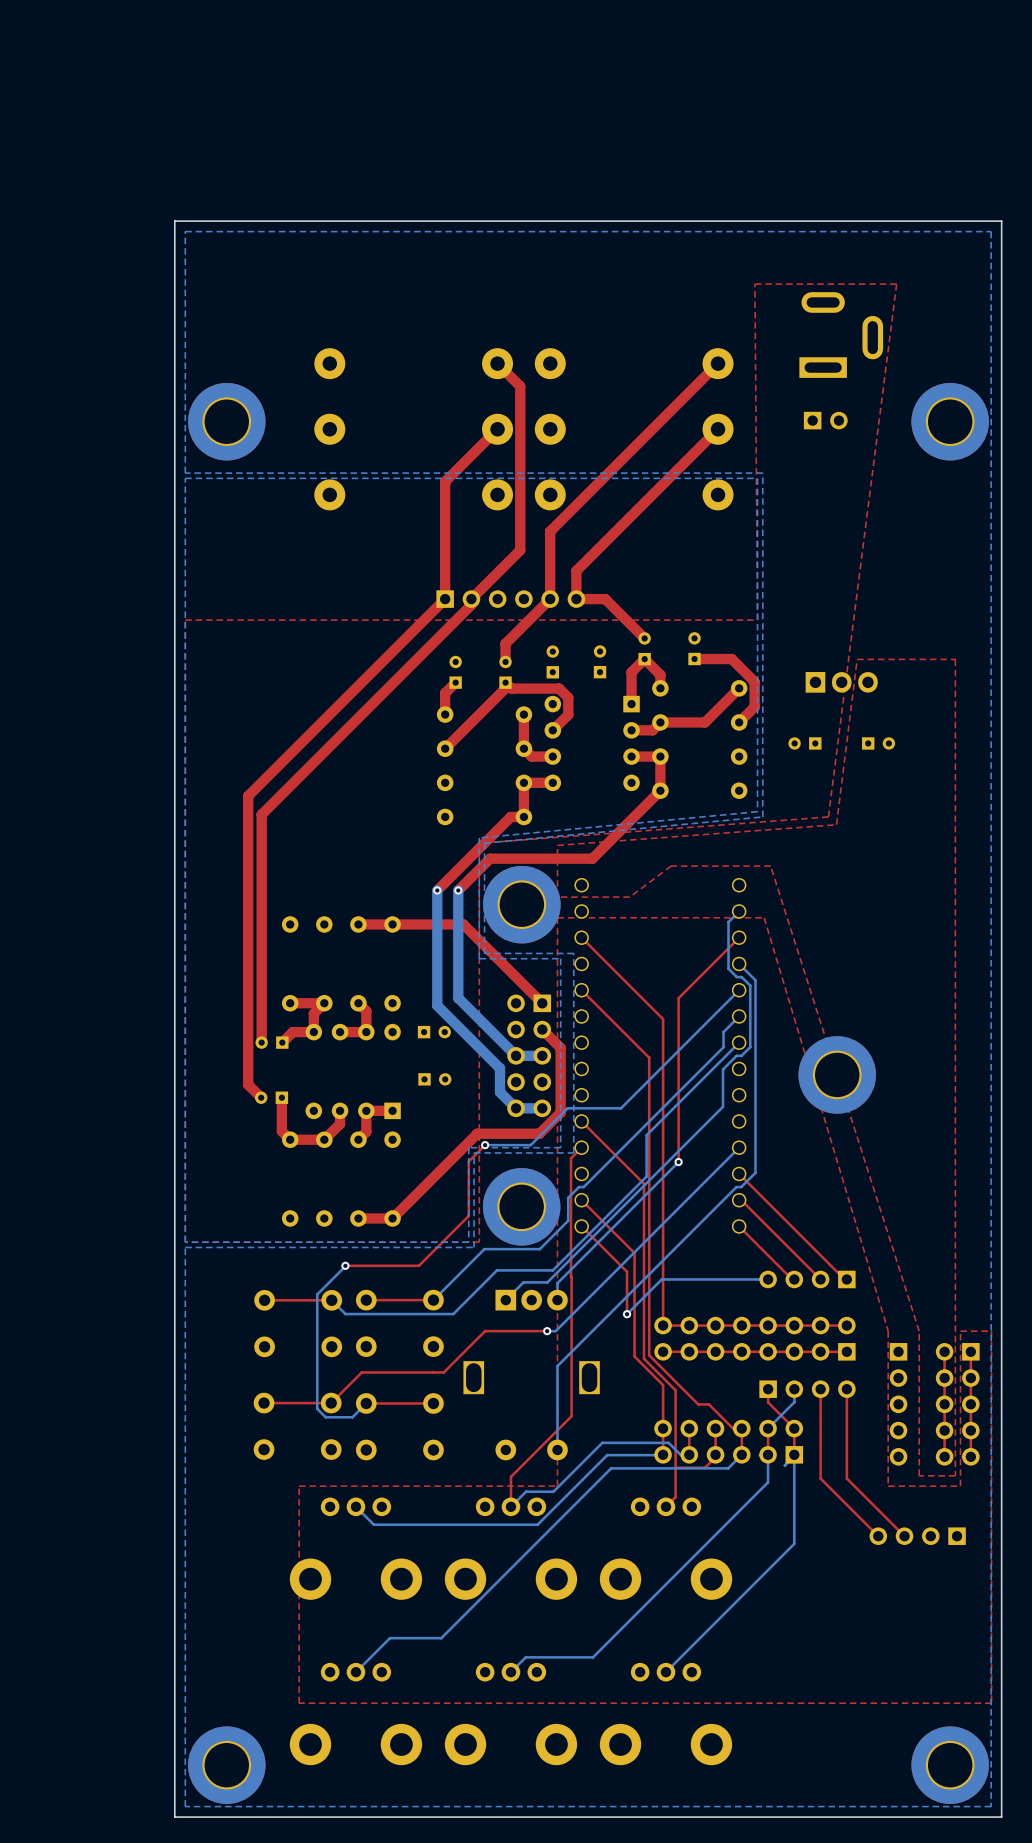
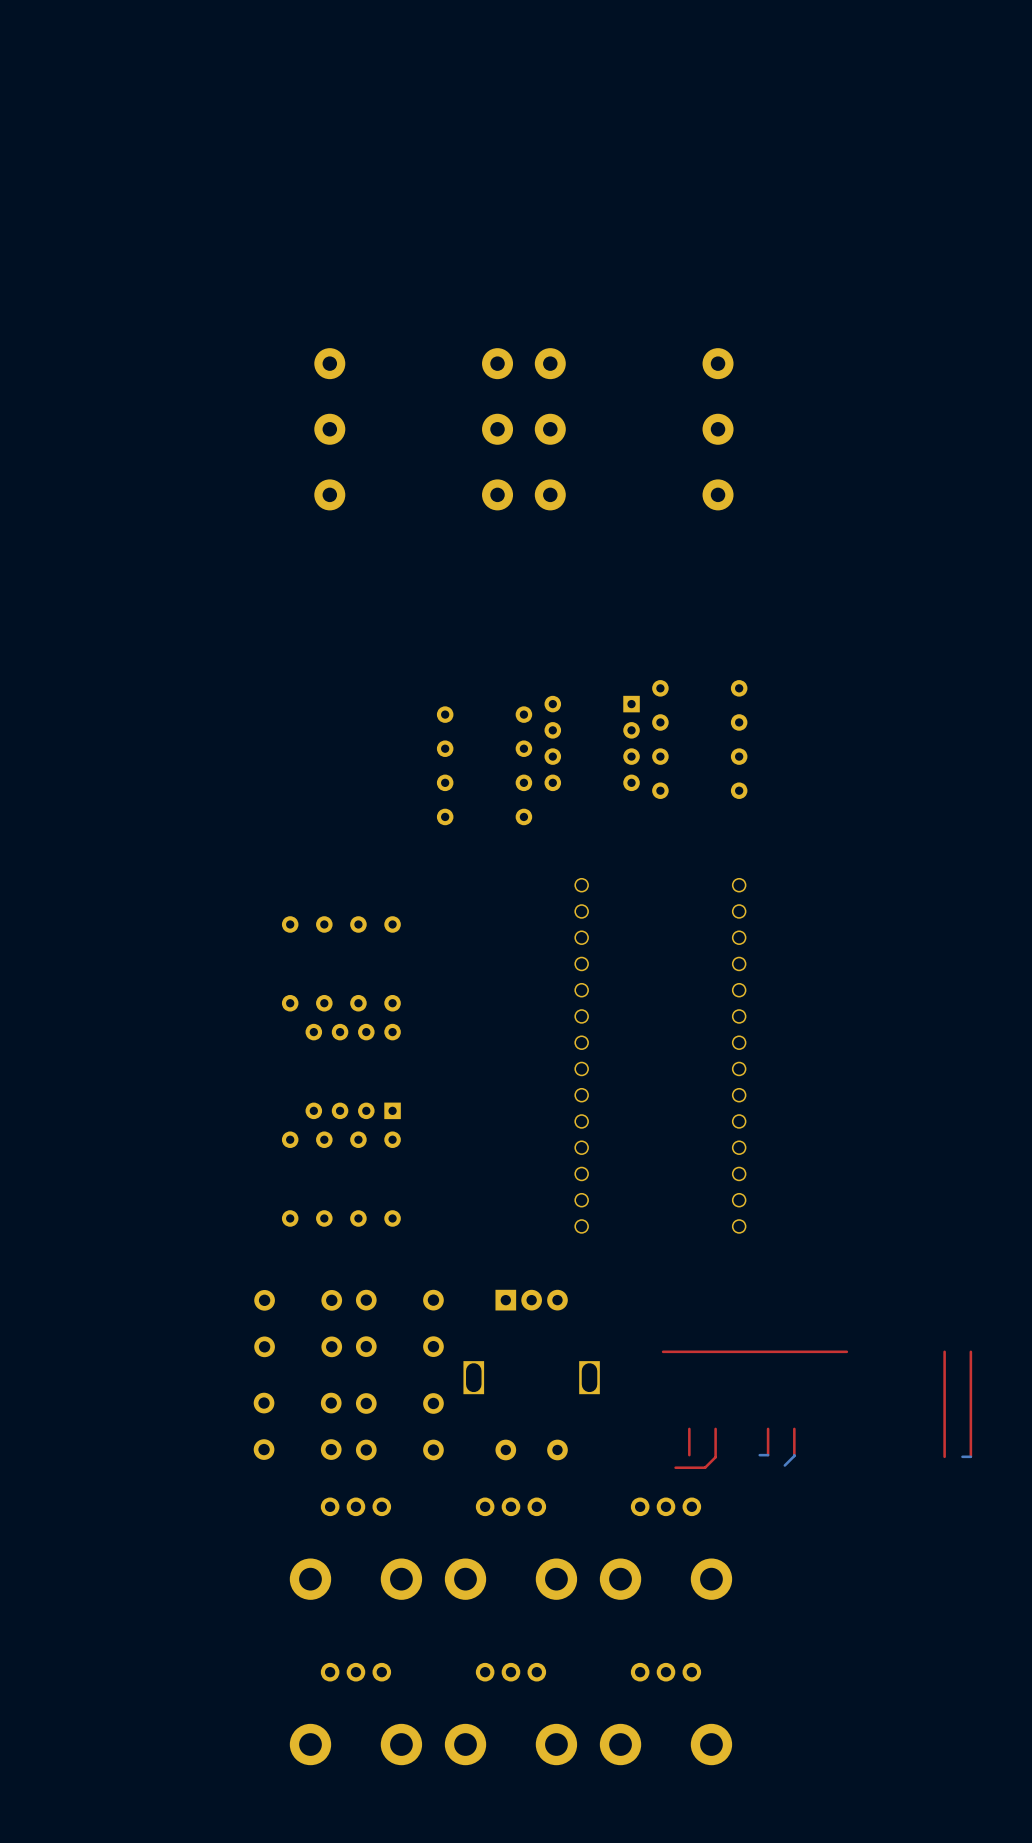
board edge: (1001, 221) (174, 221) (174, 1817) (1001, 1817) (1001, 221) -> none
bottom zone outline: (991, 231) (991, 1806) (185, 1806) (185, 1247) (474, 1247) (474, 1152) (573, 1152) (573, 953) (484, 953) (484, 843) (762, 816) (762, 473) (185, 473) (185, 231) (991, 231) -> none
top zone outline: (896, 284) (828, 816) (479, 843) (479, 1242) (185, 1242) (185, 620) (757, 620) (754, 284) (896, 284) -> none
part: (841, 335) -> none
top track: (497, 363) (520, 386) (520, 550) (471, 599) -> none
top track: (718, 363) (550, 531) (550, 599) (505, 643) (505, 661) -> none
part: (825, 420) -> none
part: (226, 421) -> none
part: (950, 421) -> none
top track: (497, 429) (445, 481) (445, 599) (248, 796) (248, 1084) (261, 1097) -> none
top track: (718, 429) (576, 570) (576, 599) (605, 599) (644, 638) -> none
bottom zone outline: (757, 478) (757, 811) (479, 837) (479, 958) (560, 958) (560, 1147) (468, 1147) (468, 1242) (185, 1242) (185, 478) (757, 478) -> none
top track: (471, 596) (471, 604) (261, 814) (261, 1042) -> none
part: (510, 599) -> none
part: (644, 648) -> none
part: (694, 648) -> none
top track: (694, 659) (731, 659) (754, 681) (754, 706) (739, 722) -> none
top zone outline: (955, 659) (955, 1475) (919, 1475) (919, 1331) (770, 866) (671, 866) (629, 897) (557, 897) (557, 845) (836, 824) (857, 659) (955, 659) -> none
part: (552, 661) -> none
part: (600, 661) -> none
part: (455, 672) -> none
part: (505, 672) -> none
top track: (455, 682) (445, 693) (445, 714) -> none
part: (841, 682) -> none
top track: (660, 688) (660, 674) (644, 659) (631, 672) (631, 704) -> none
top track: (739, 688) (705, 722) (660, 722) (652, 730) (631, 730) -> none
top track: (523, 714) (523, 748) (531, 756) (552, 756) -> none
top track: (552, 730) (568, 714) (568, 697) (559, 688) (511, 688) (505, 682) (505, 688) (445, 748) -> none
part: (804, 743) -> none
part: (878, 743) -> none
top track: (631, 756) (660, 756) (660, 790) (592, 858) (490, 858) (458, 890) -> none
top track: (552, 782) (523, 782) (523, 816) (510, 816) (437, 890) -> none
bottom track: (437, 890) (437, 1005) (500, 1068) (500, 1092) (516, 1108) (542, 1108) -> none
via: (437, 890) -> none
bottom track: (458, 890) (458, 998) (516, 1055) (542, 1055) -> none
via: (458, 890) -> none
part: (521, 904) -> none
bottom track: (739, 911) (728, 922) (728, 968) (736, 977) (741, 977) (750, 985) (750, 1047) (741, 1055) (736, 1055) (723, 1069) (723, 1106) (547, 1282) (523, 1282) (505, 1300) -> none
top zone outline: (764, 917) (557, 917) (557, 1486) (299, 1486) (299, 1703) (991, 1703) (991, 1331) (960, 1331) (960, 1486) (888, 1486) (888, 1331) (764, 917) -> none
top track: (358, 924) (463, 924) (542, 1003) -> none
top track: (581, 937) (663, 1019) (663, 1325) (846, 1325) (846, 1329) -> none
top track: (739, 937) (678, 998) (678, 1162) -> none
bottom track: (739, 963) (755, 980) (755, 1172) (741, 1187) (736, 1187) (557, 1366) (557, 1449) -> none
top track: (581, 990) (649, 1057) (649, 1355) (698, 1404) (709, 1404) (733, 1428) (741, 1428) (741, 1455) -> none
bottom track: (739, 990) (621, 1108) (567, 1108) (530, 1145) (485, 1145) -> none
top track: (290, 1003) (324, 1003) (313, 1013) (313, 1032) (292, 1032) (282, 1042) -> none
top track: (358, 1003) (366, 1011) (366, 1032) (340, 1032) -> none
bottom track: (739, 1016) (723, 1032) (723, 1047) (583, 1187) (579, 1187) (568, 1197) (568, 1220) (539, 1249) (484, 1249) (433, 1300) -> none
top track: (542, 1029) (560, 1047) (560, 1112) (539, 1133) (477, 1133) (392, 1218) (358, 1218) -> none
part: (434, 1032) -> none
part: (271, 1042) -> none
bottom track: (739, 1042) (646, 1135) (646, 1176) (552, 1270) (497, 1270) (453, 1314) (345, 1314) (331, 1300) -> none
part: (529, 1055) -> none
part: (837, 1074) -> none
part: (434, 1079) -> none
part: (271, 1097) -> none
top track: (281, 1097) (281, 1131) (290, 1139) (324, 1139) (340, 1123) (340, 1110) -> none
top track: (392, 1110) (366, 1110) (366, 1131) (358, 1139) -> none
top track: (581, 1121) (644, 1183) (644, 1358) (675, 1390) (675, 1497) (665, 1506) -> none
top track: (485, 1145) (468, 1161) (468, 1215) (418, 1265) (345, 1265) -> none
via: (485, 1145) -> none
top track: (581, 1147) (570, 1158) (571, 1416) (510, 1476) (510, 1506) -> none
bottom track: (739, 1147) (555, 1331) (547, 1331) -> none
bottom track: (678, 1162) (557, 1283) (557, 1300) -> none
via: (678, 1162) -> none
top track: (739, 1173) (844, 1279) (846, 1279) -> none
top track: (581, 1200) (634, 1253) (634, 1356) (663, 1385) (663, 1455) -> none
top track: (739, 1200) (741, 1200) (820, 1279) -> none
part: (521, 1206) -> none
top track: (581, 1226) (627, 1271) (627, 1314) -> none
top track: (739, 1226) (792, 1279) (794, 1279) -> none
bottom track: (345, 1265) (317, 1294) (317, 1408) (325, 1417) (352, 1417) (366, 1403) -> none
via: (345, 1265) -> none
bottom track: (768, 1279) (661, 1279) (627, 1314) -> none
part: (807, 1279) -> none
top track: (331, 1300) (264, 1300) -> none
top track: (433, 1300) (366, 1300) -> none
via: (627, 1314) -> none
top track: (547, 1331) (485, 1331) (443, 1372) (361, 1372) (331, 1403) (264, 1403) -> none
via: (547, 1331) -> none
part: (754, 1338) -> none
top track: (768, 1389) (768, 1402) (794, 1428) -> none
bottom track: (794, 1389) (794, 1402) (768, 1428) -> none
part: (807, 1389) -> none
top track: (820, 1389) (820, 1478) (878, 1536) -> none
top track: (846, 1389) (846, 1478) (904, 1536) -> none
top track: (433, 1403) (366, 1403) -> none
part: (898, 1404) -> none
part: (957, 1404) -> none
part: (728, 1441) -> none
bottom track: (741, 1454) (728, 1468) (611, 1468) (441, 1638) (389, 1638) (355, 1672) -> none
bottom track: (768, 1454) (768, 1482) (593, 1657) (525, 1657) (510, 1672) -> none
bottom track: (794, 1454) (794, 1543) (665, 1672) -> none
bottom track: (663, 1455) (607, 1455) (537, 1524) (373, 1524) (355, 1506) -> none
bottom track: (689, 1455) (680, 1455) (668, 1442) (602, 1442) (553, 1491) (526, 1491) (510, 1506) -> none
part: (917, 1536) -> none
part: (226, 1765) -> none
part: (950, 1765) -> none

